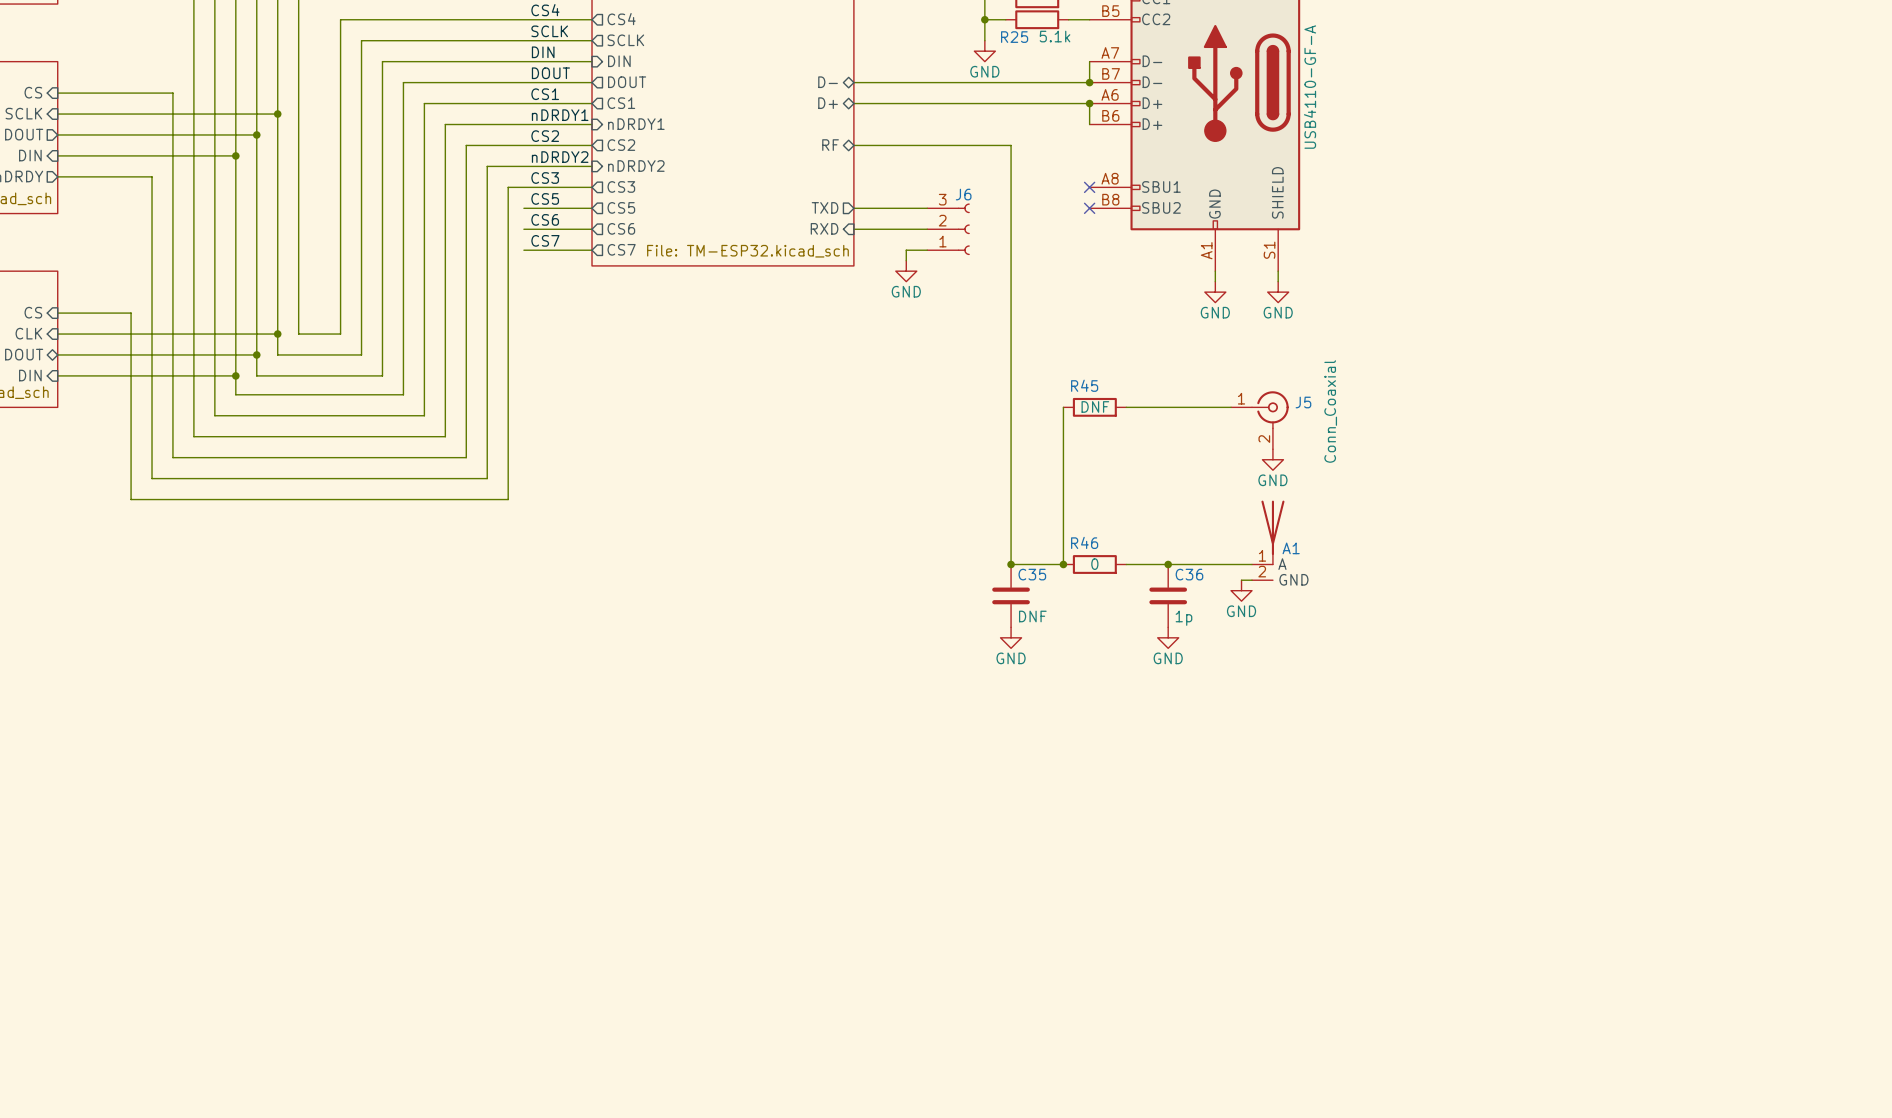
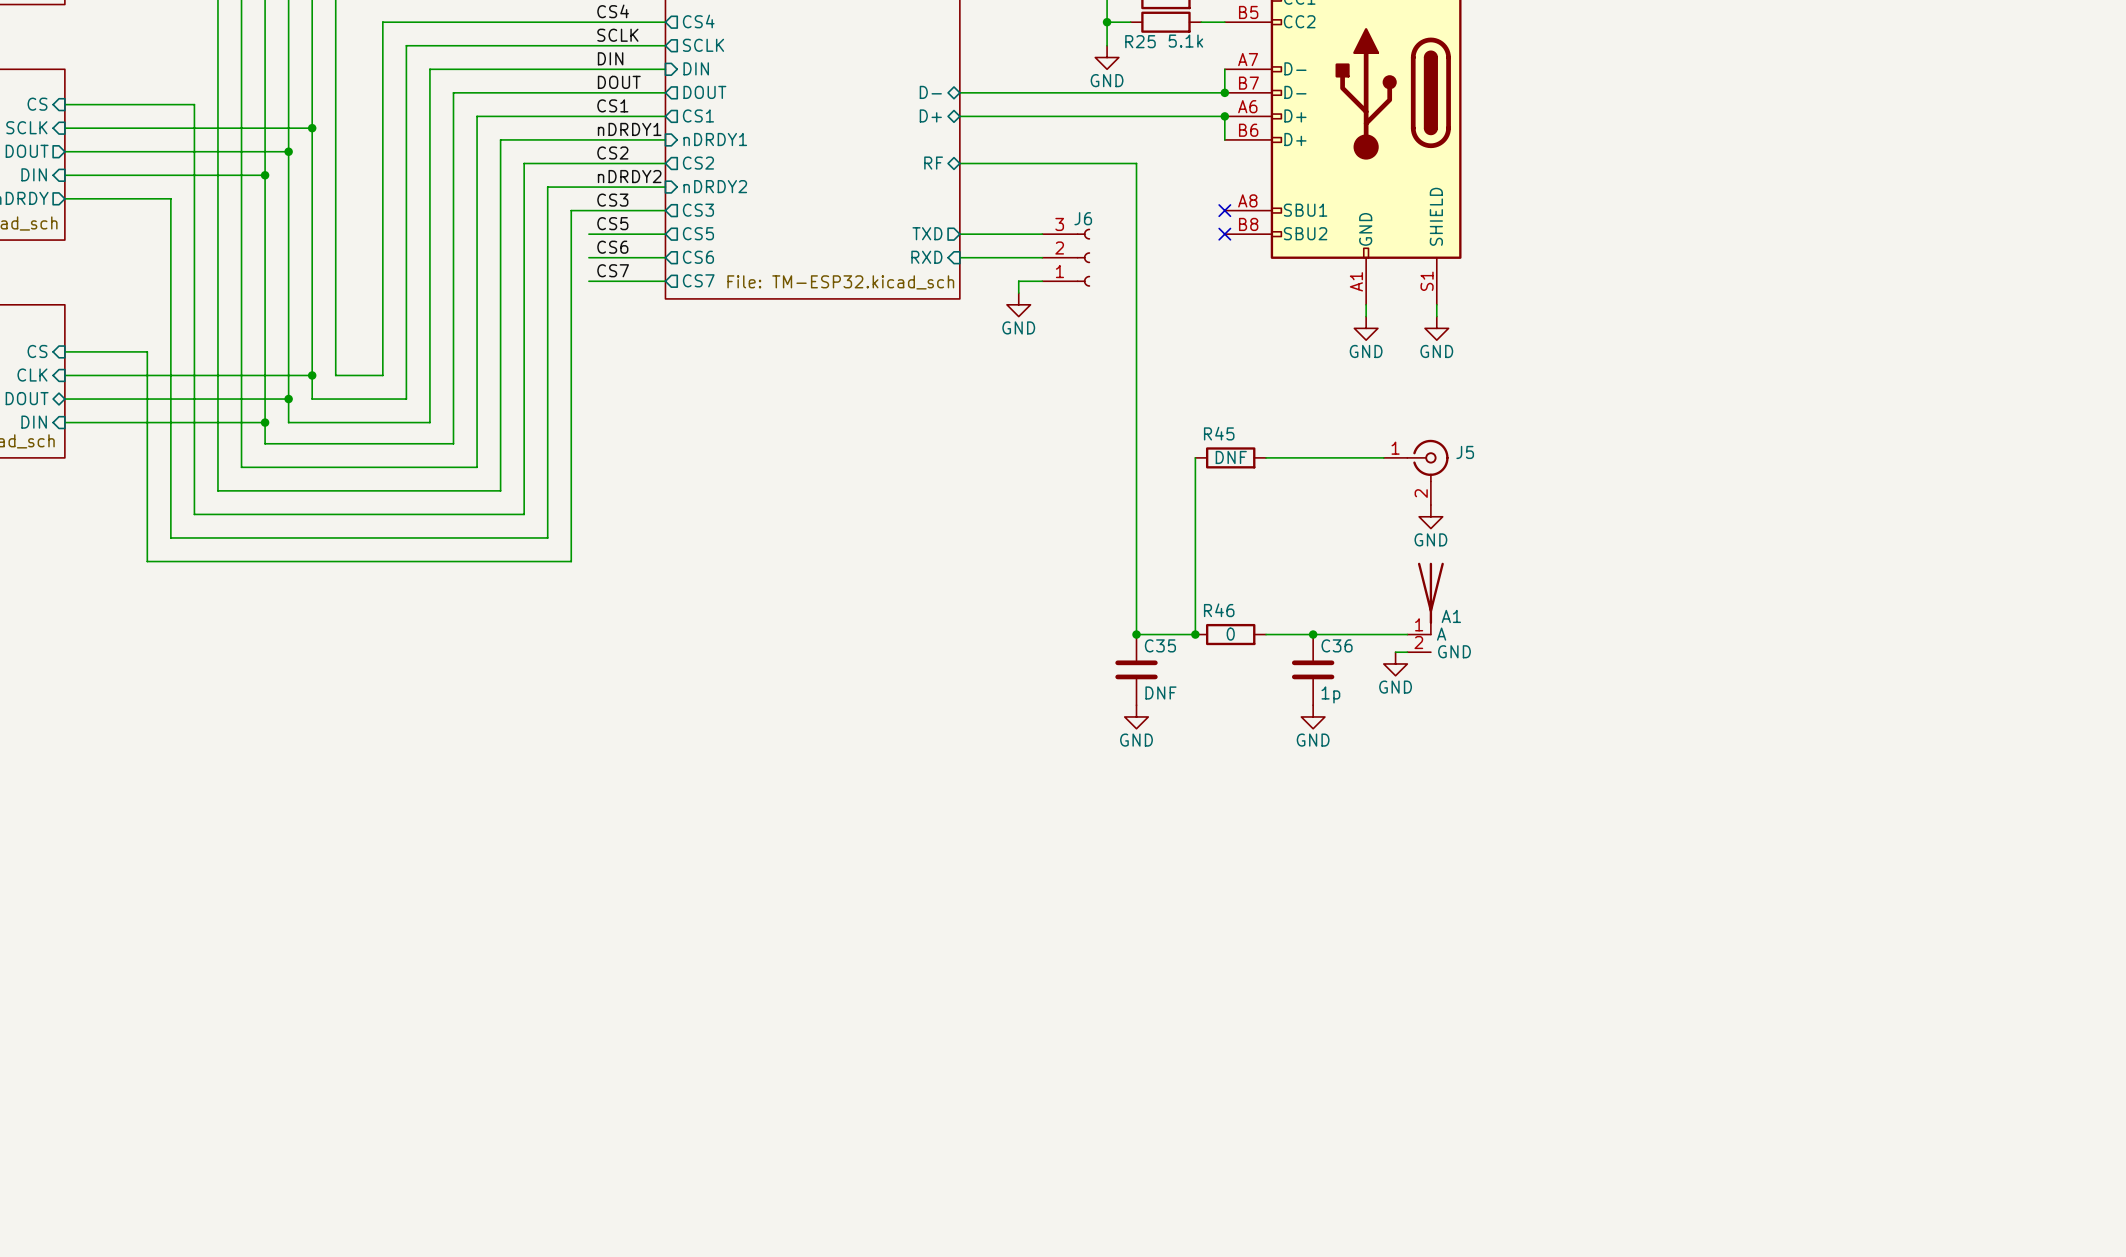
part value: USB4110-GF-A (1310, 87) -> none
J5 value: Conn_Coaxial (1330, 411) -> none

